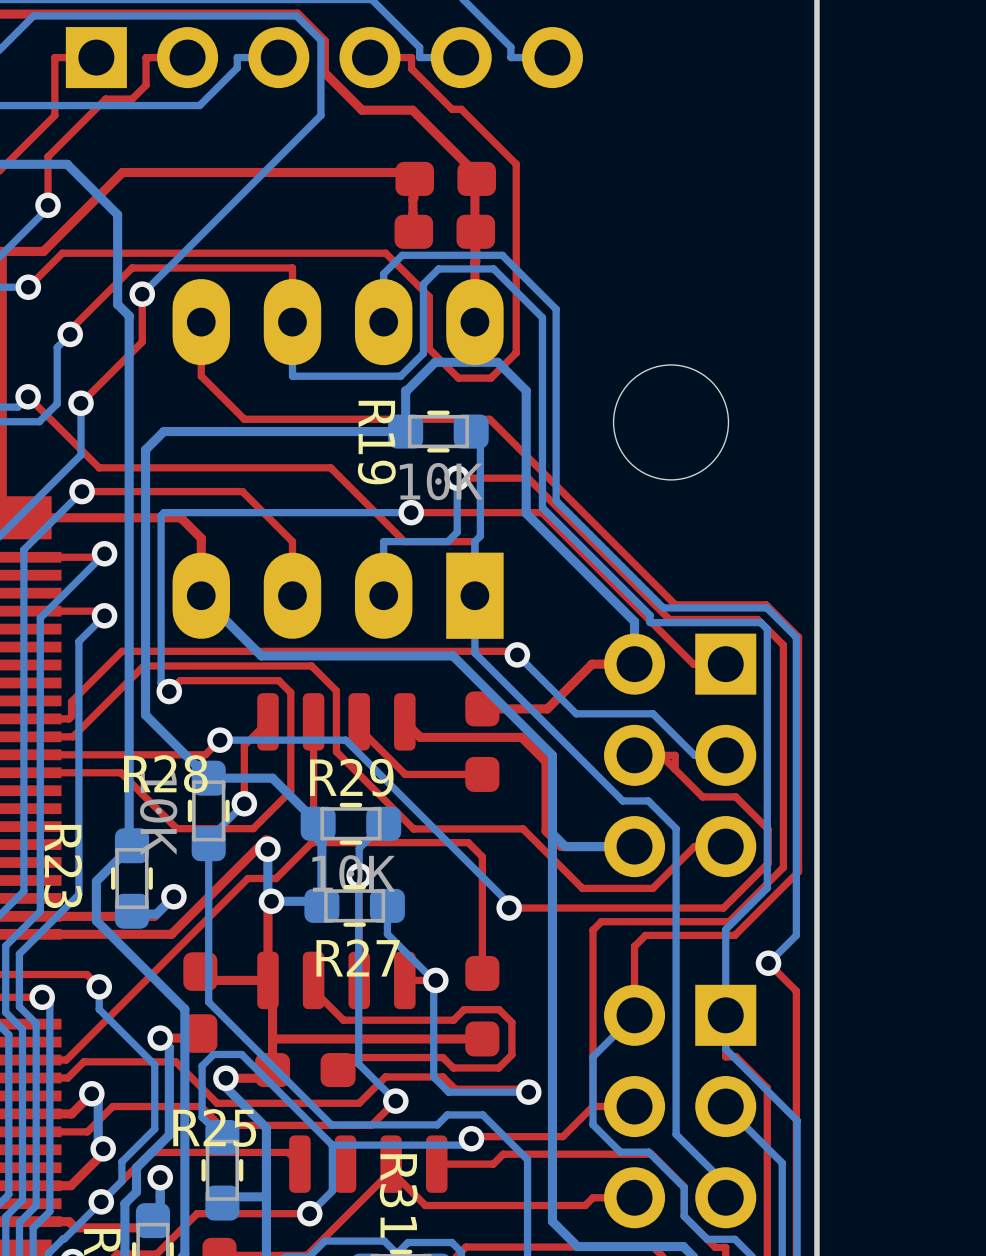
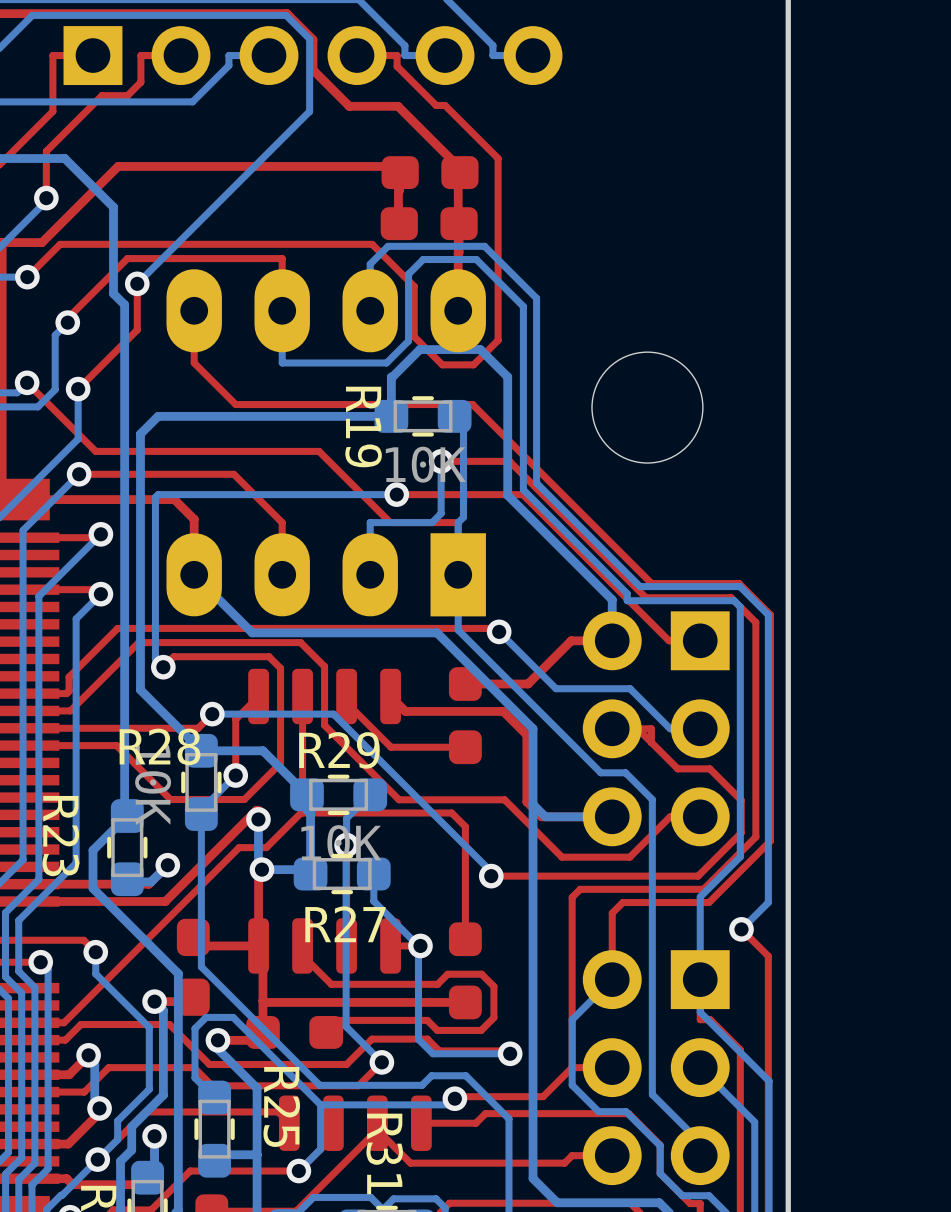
R25 name rotation: 0° (214, 1128) -> 90° clockwise (281, 1107)

